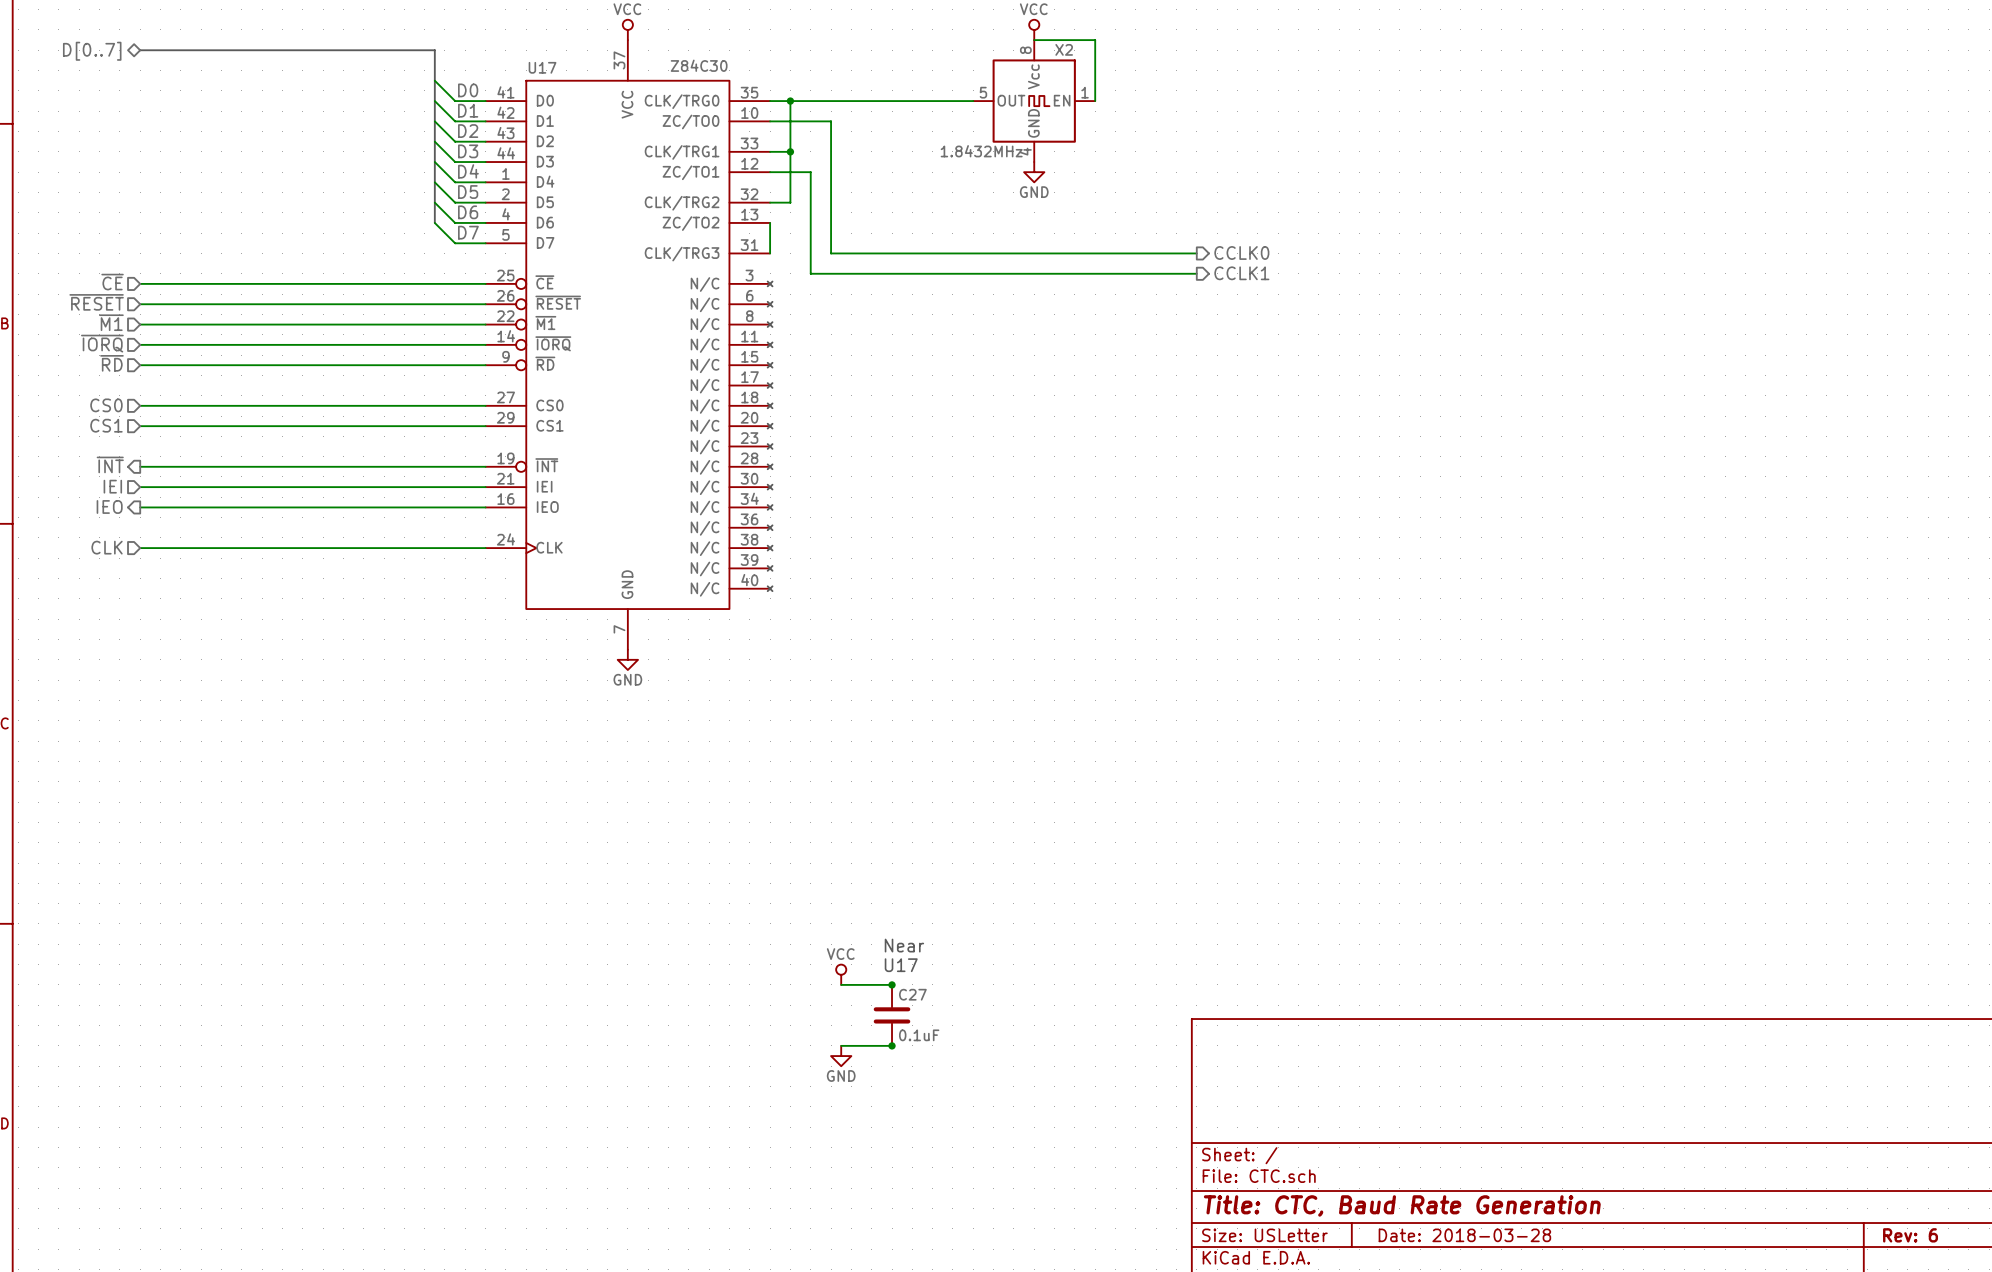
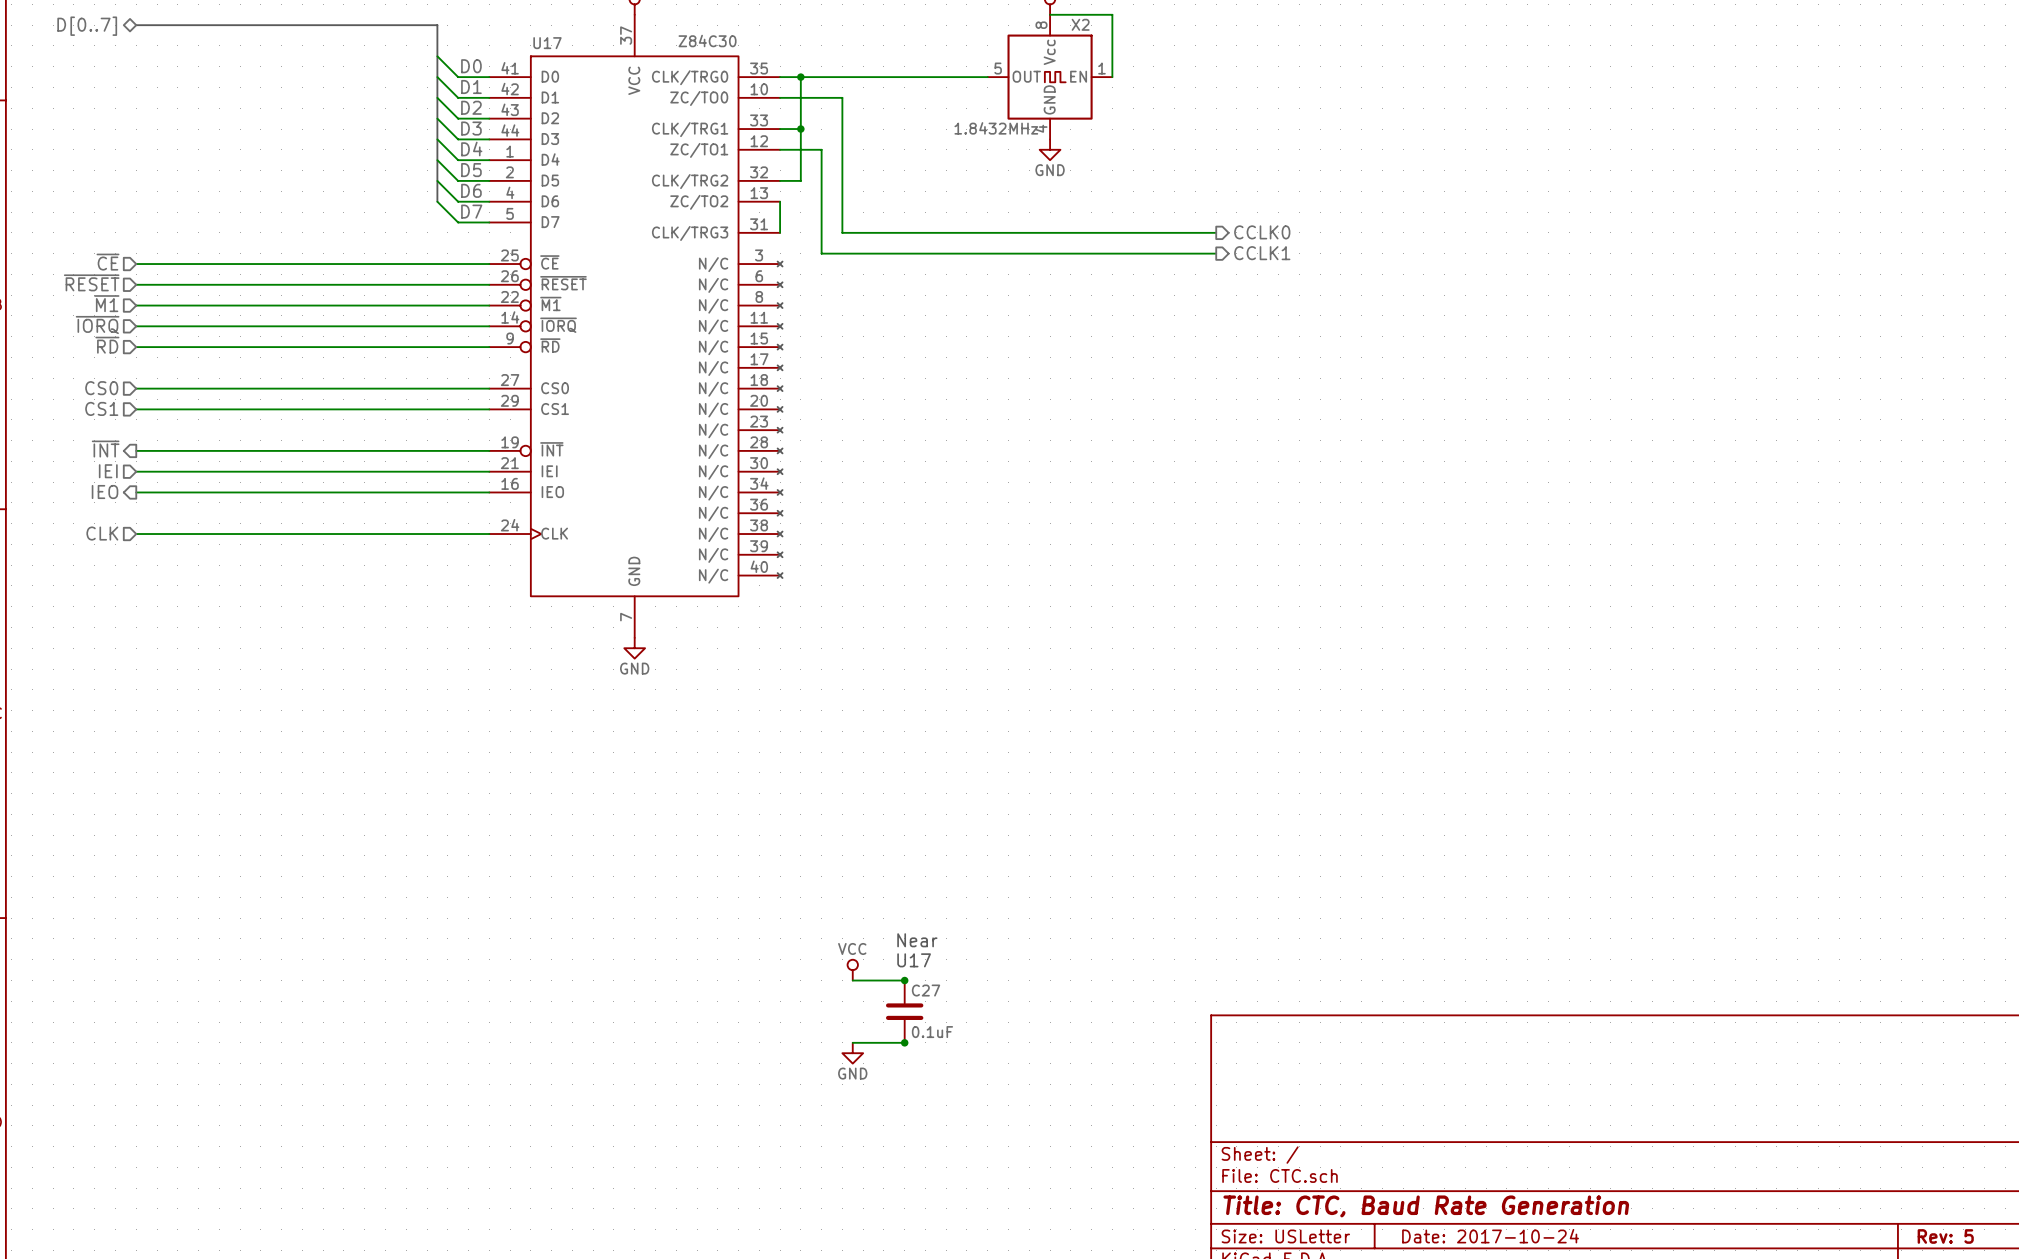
title block: Date: 2018-03-28 (1464, 1235) -> Date: 2017-10-24 (1490, 1236)
title block: Rev: 6 (1910, 1235) -> Rev: 5 (1945, 1236)

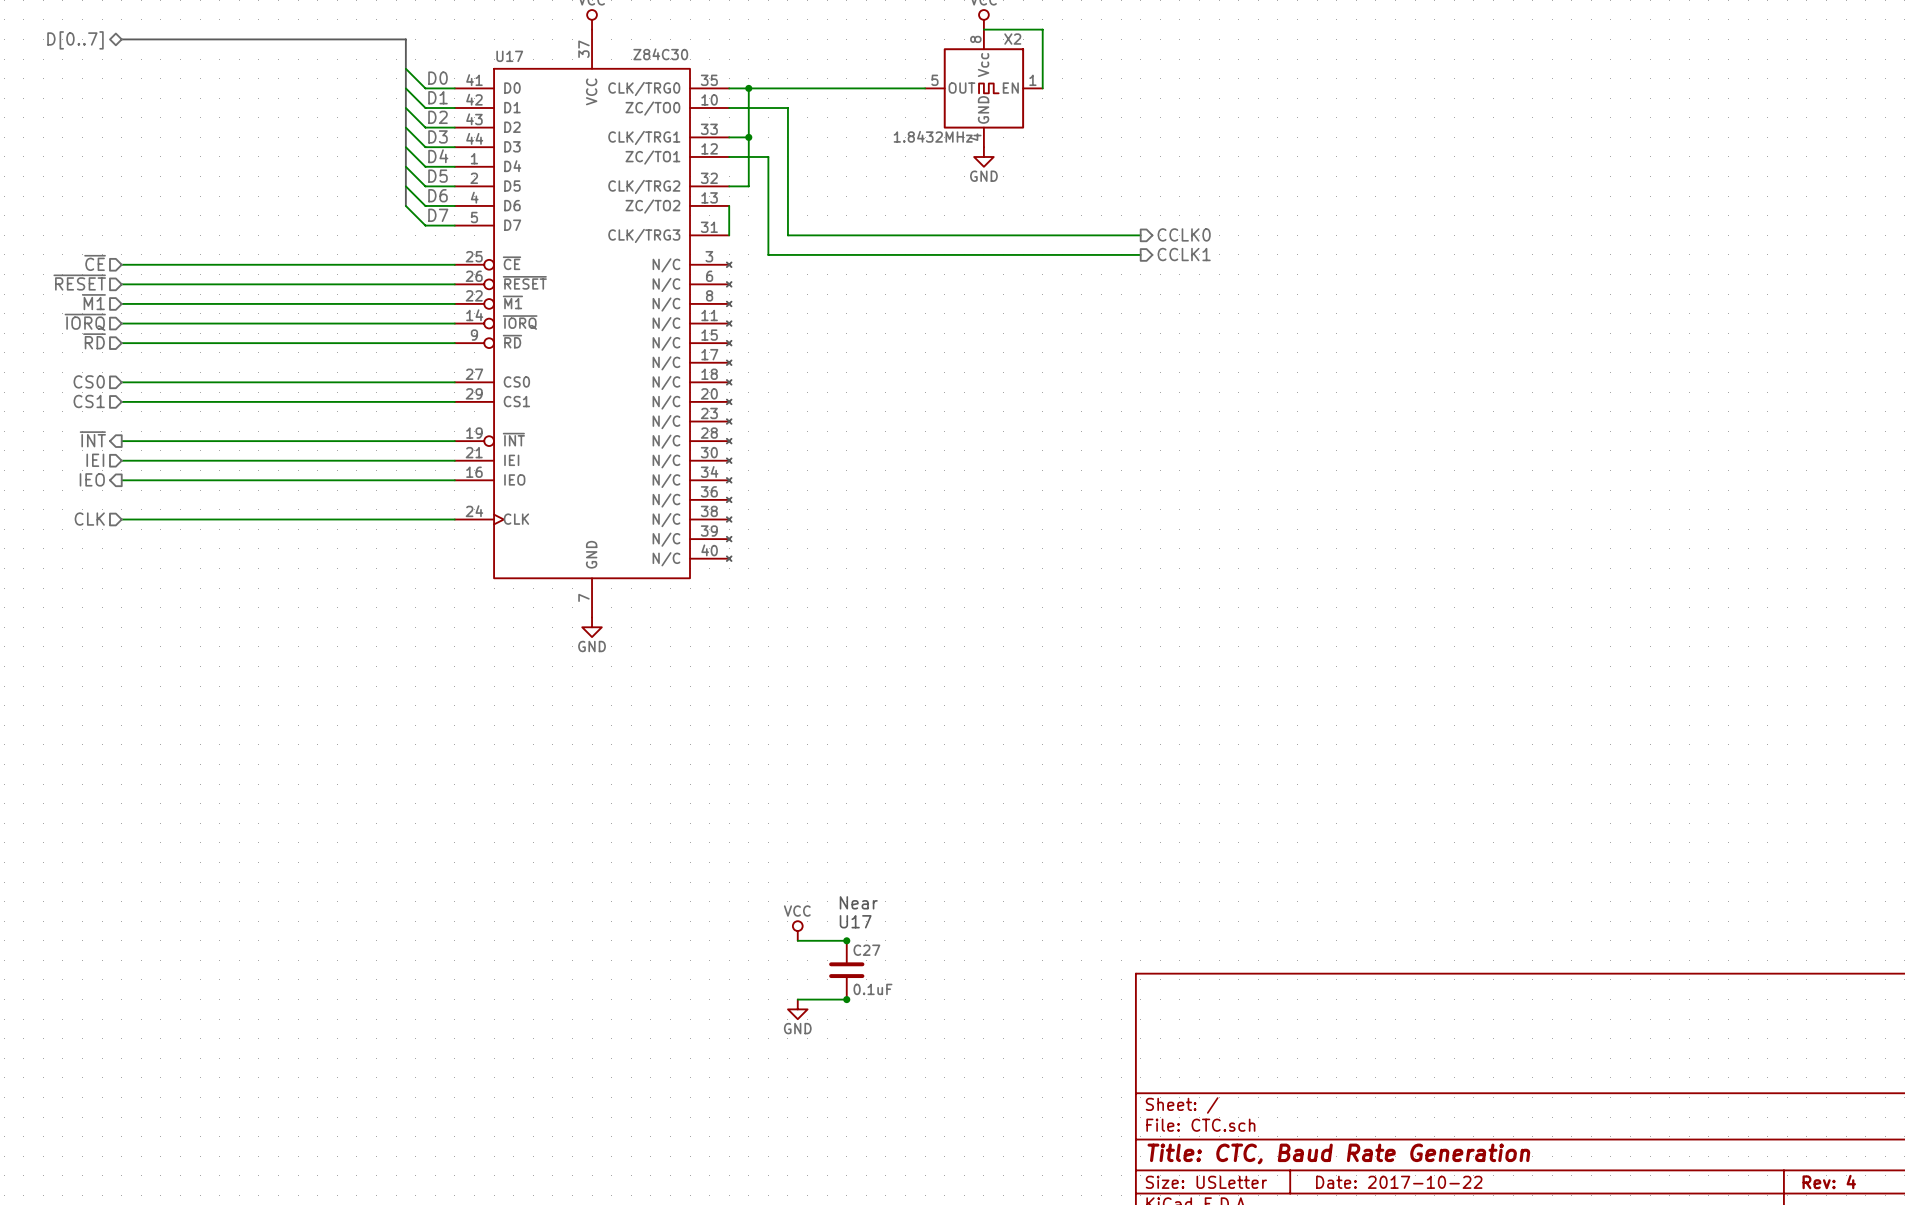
title block: Date: 2017-10-24 (1490, 1236) -> Date: 2017-10-22 (1399, 1182)
title block: Rev: 5 (1945, 1236) -> Rev: 4 (1829, 1182)

